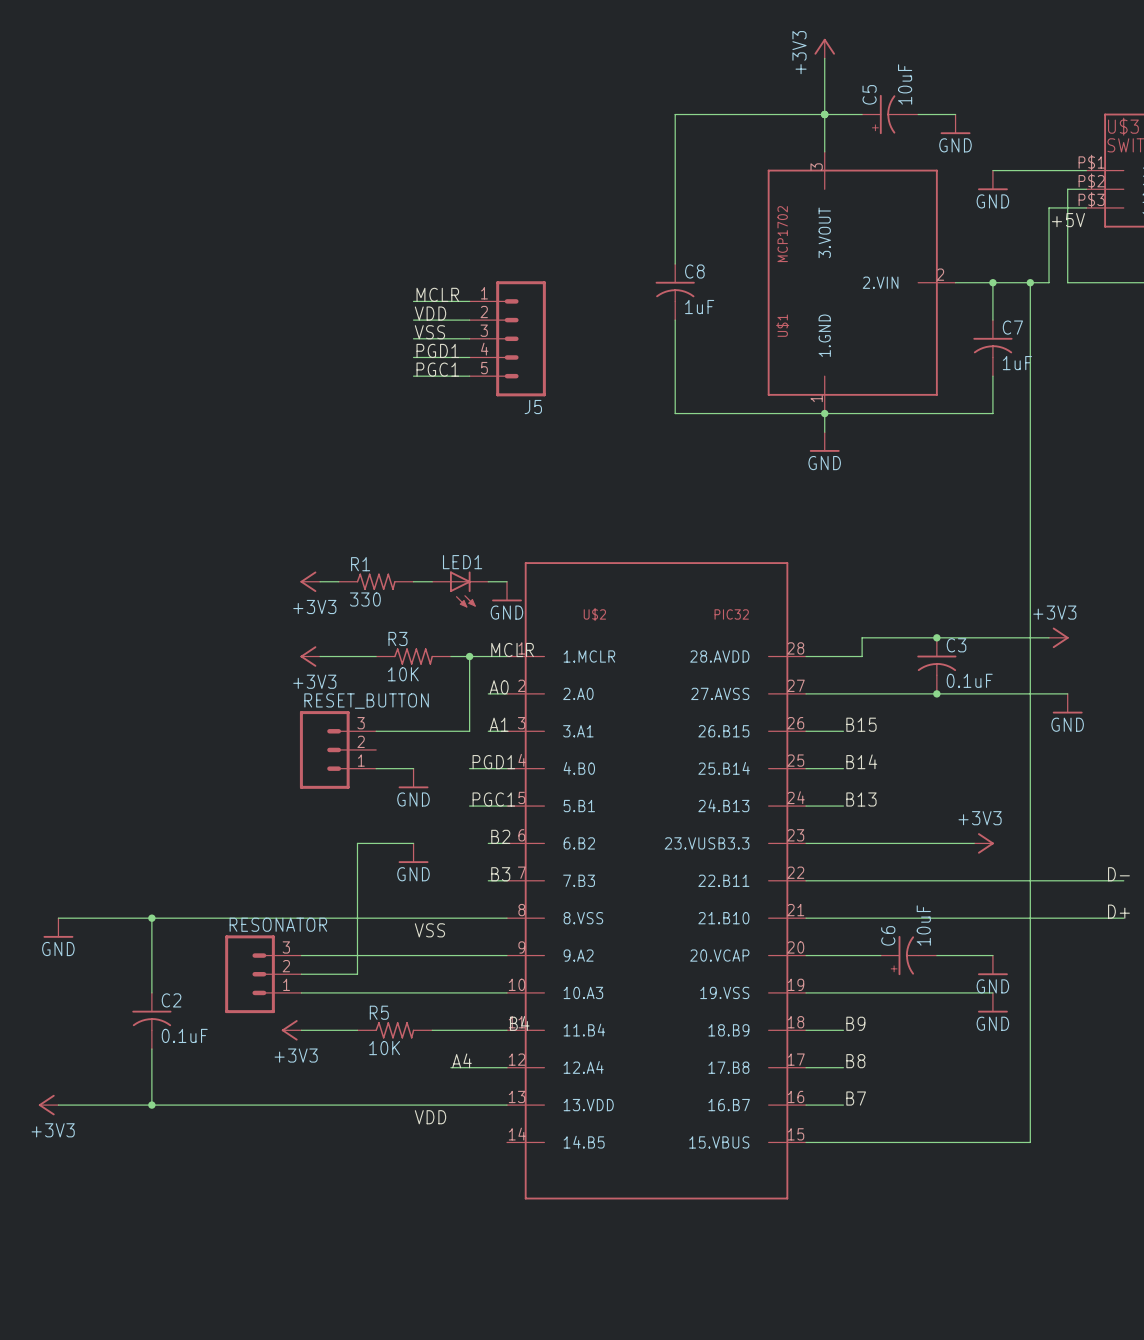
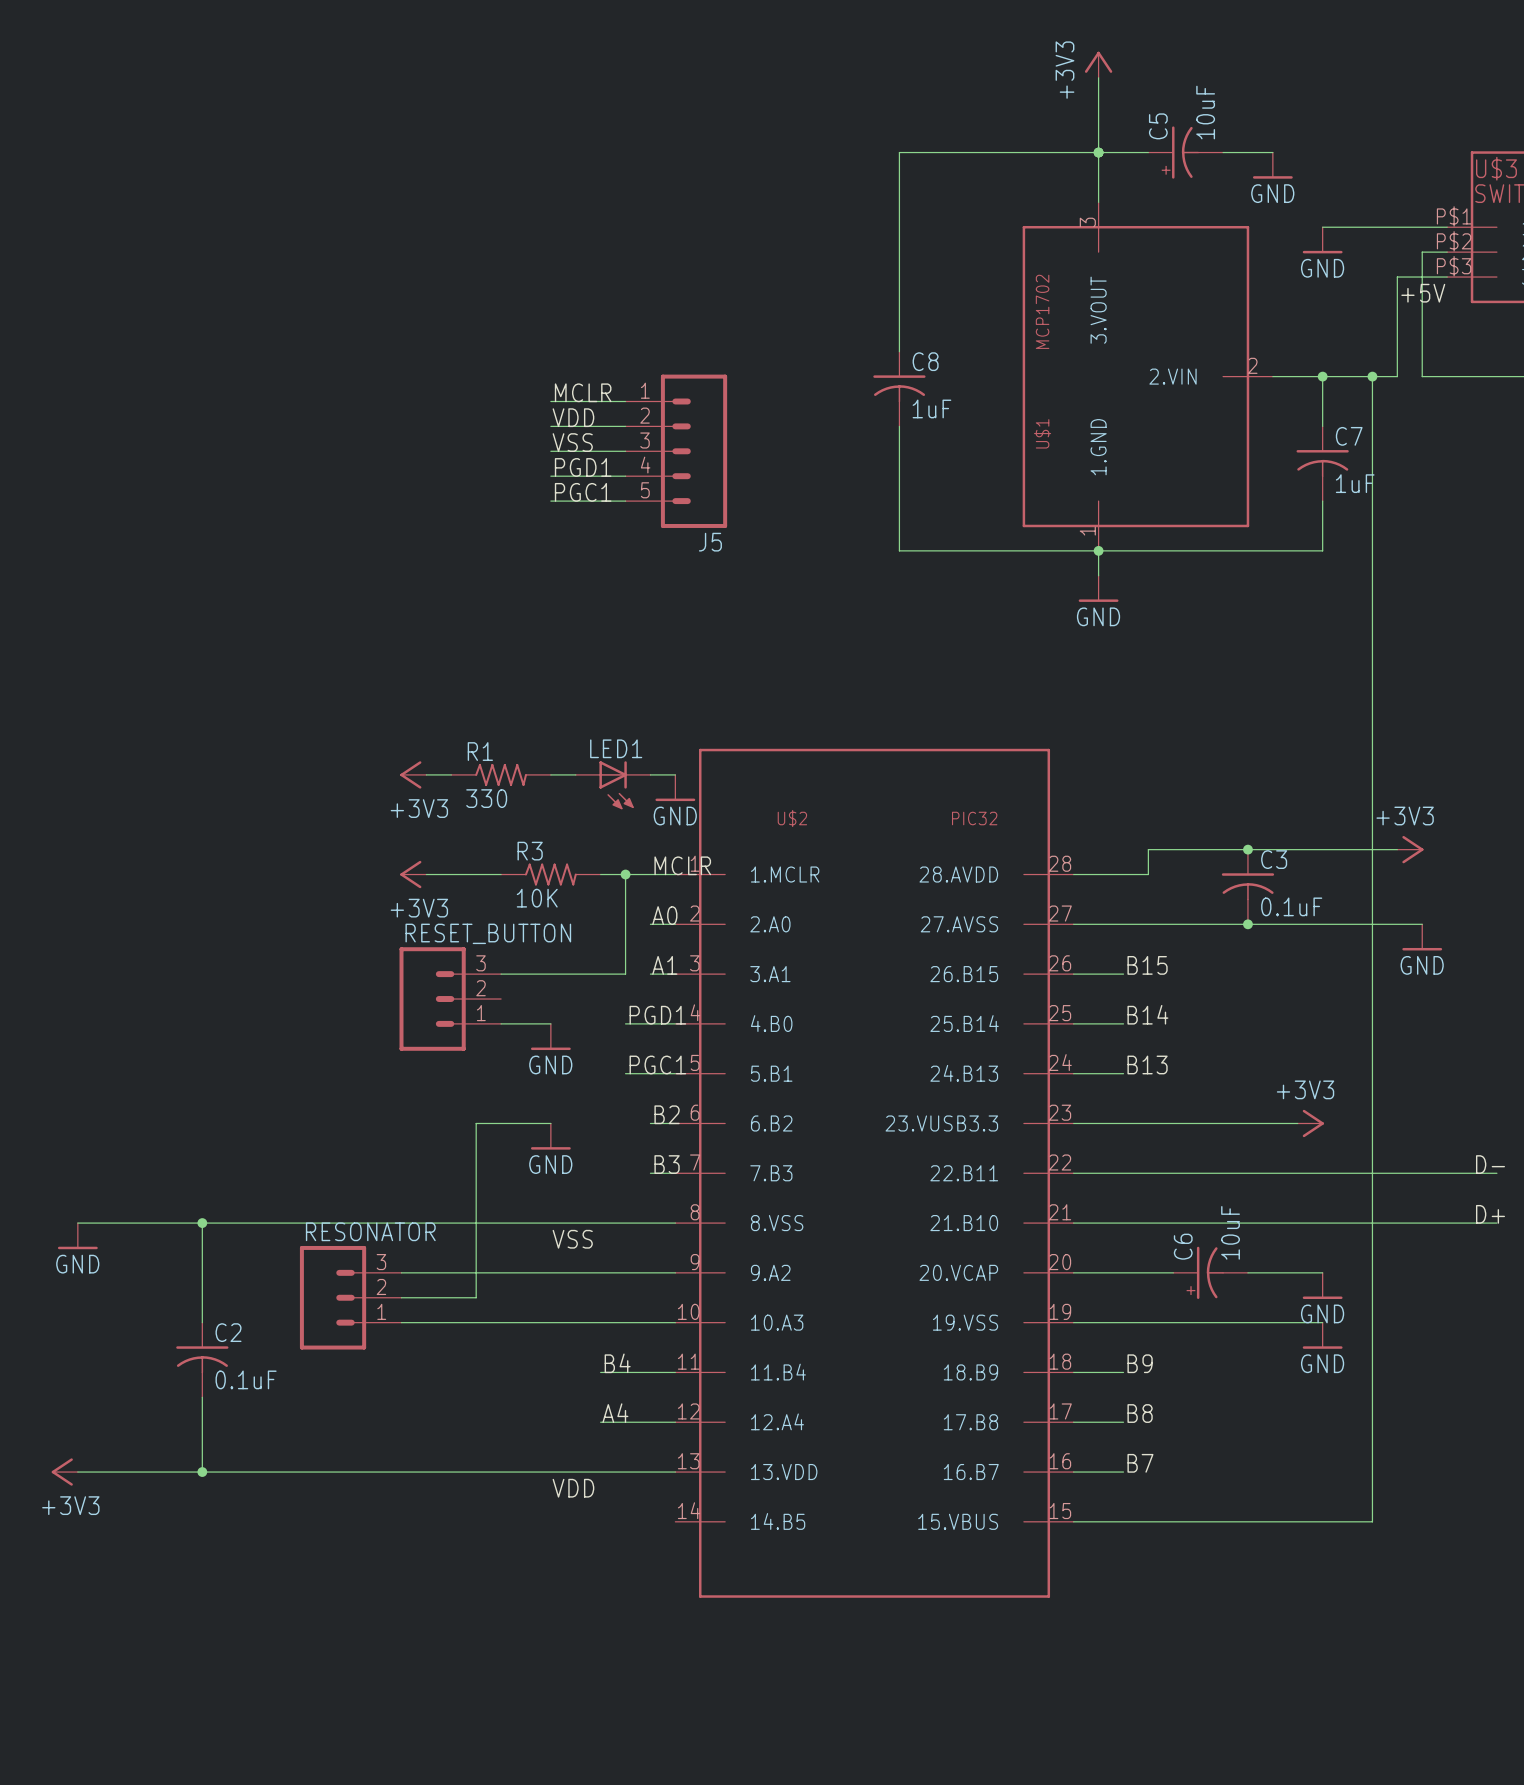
label position: B4 (519, 1023) -> B4 (617, 1363)
power symbol: +3V3 (291, 1030) -> none
wire: (301, 1030) (357, 1030) -> none
R5: 10K (394, 1030) -> none
wire: (432, 1030) (450, 1030) -> none

